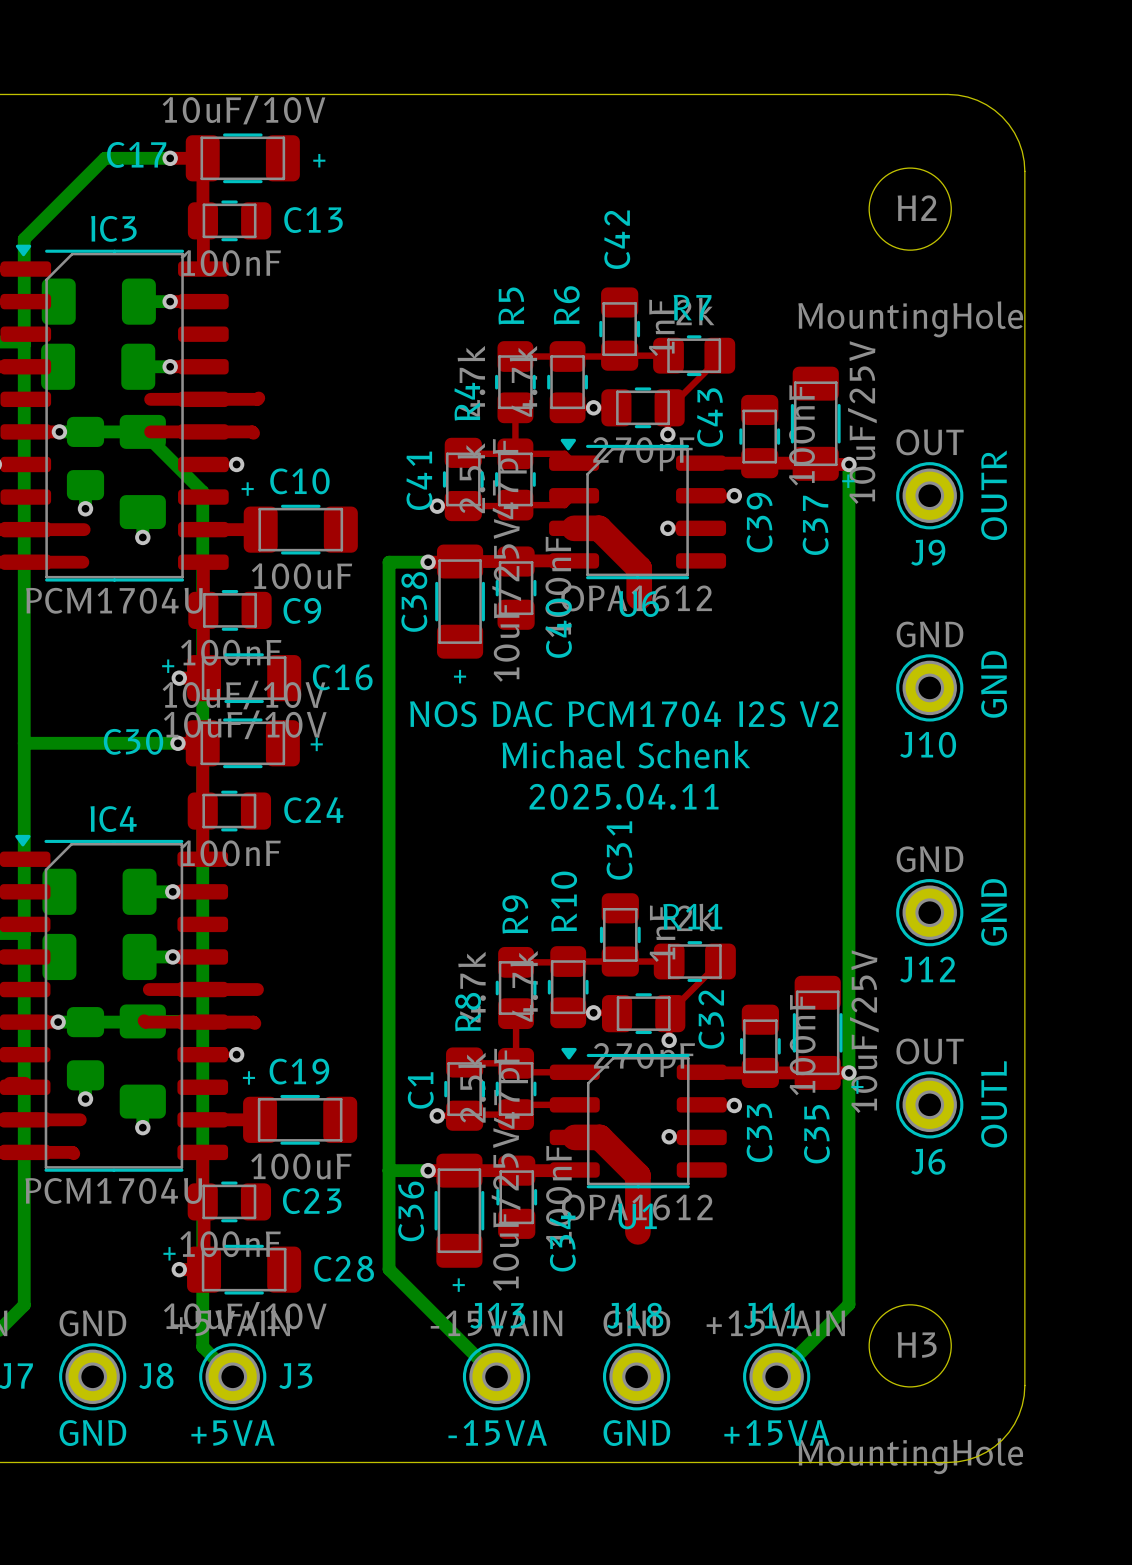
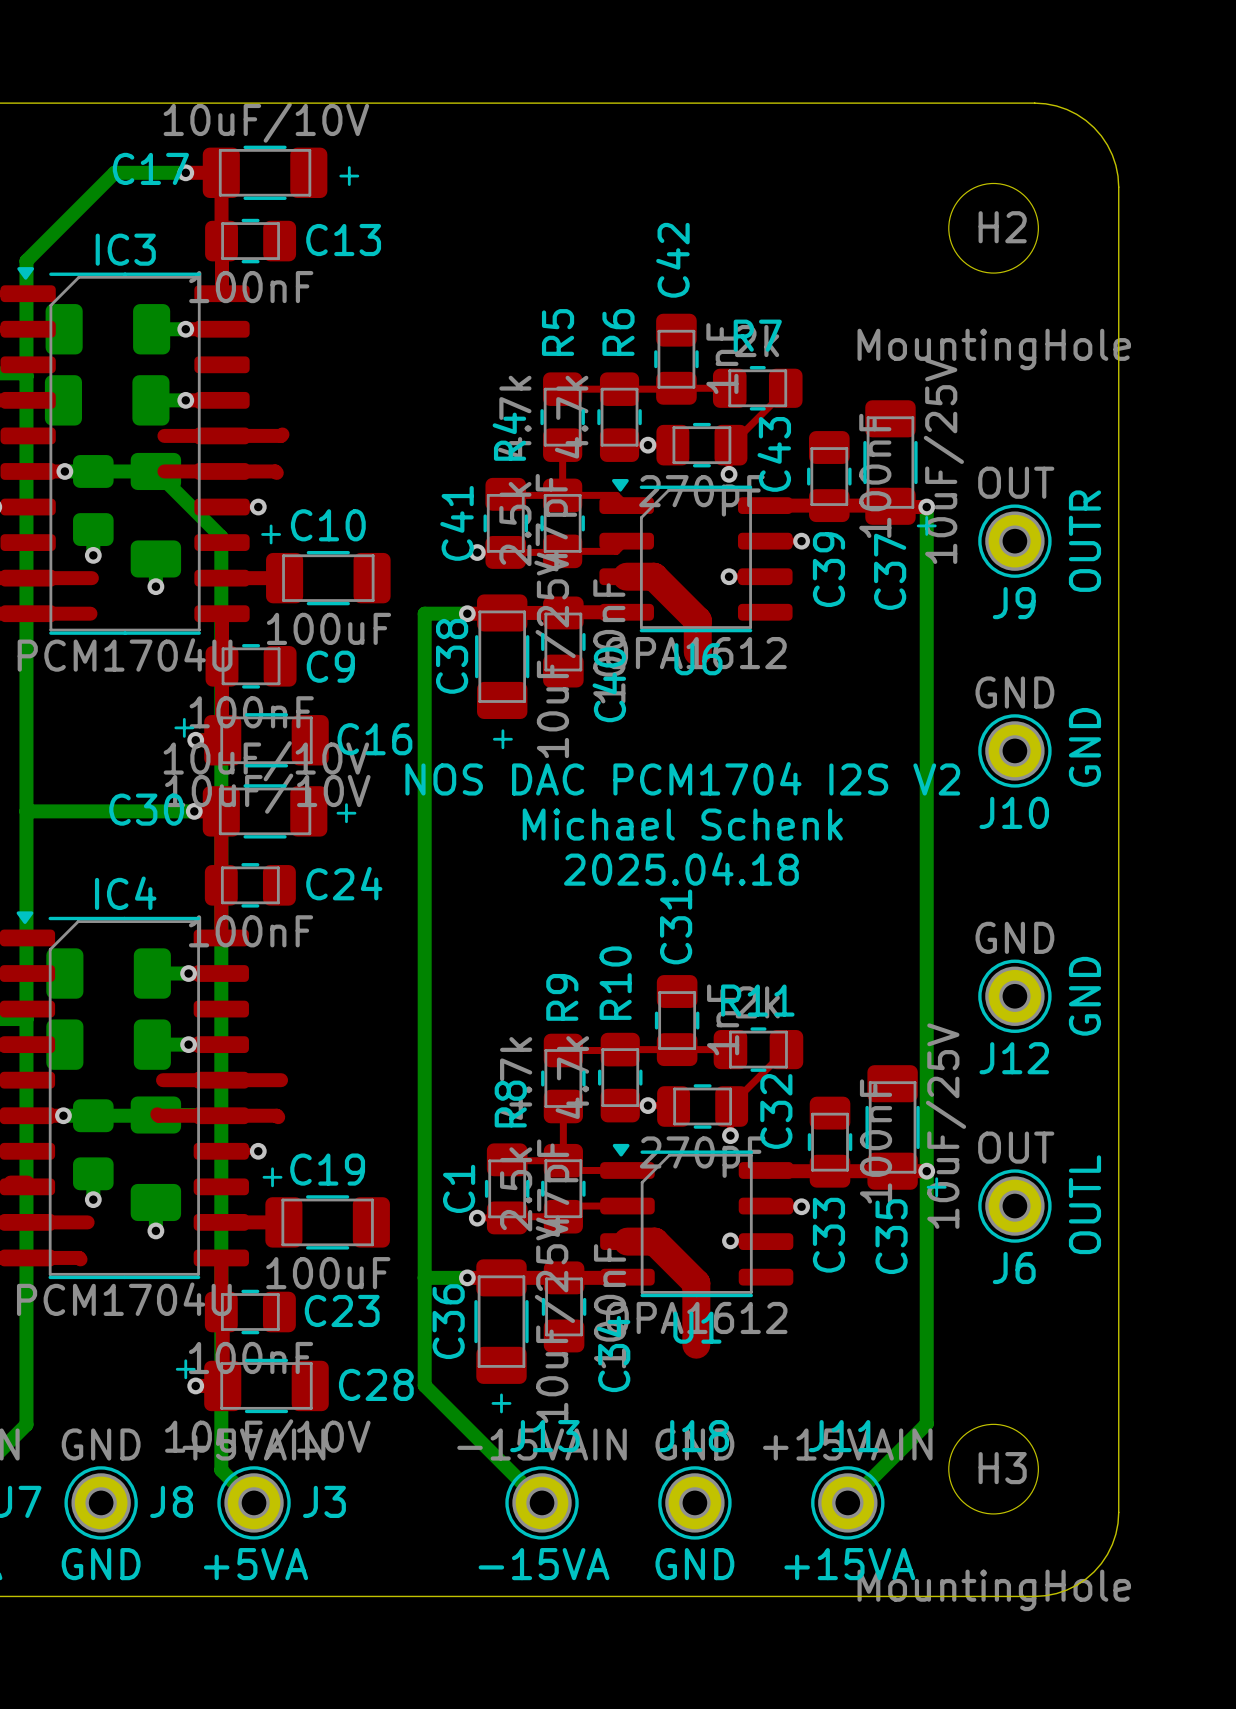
text: 2025.04.11 (624, 796) -> 2025.04.18 (681, 868)

